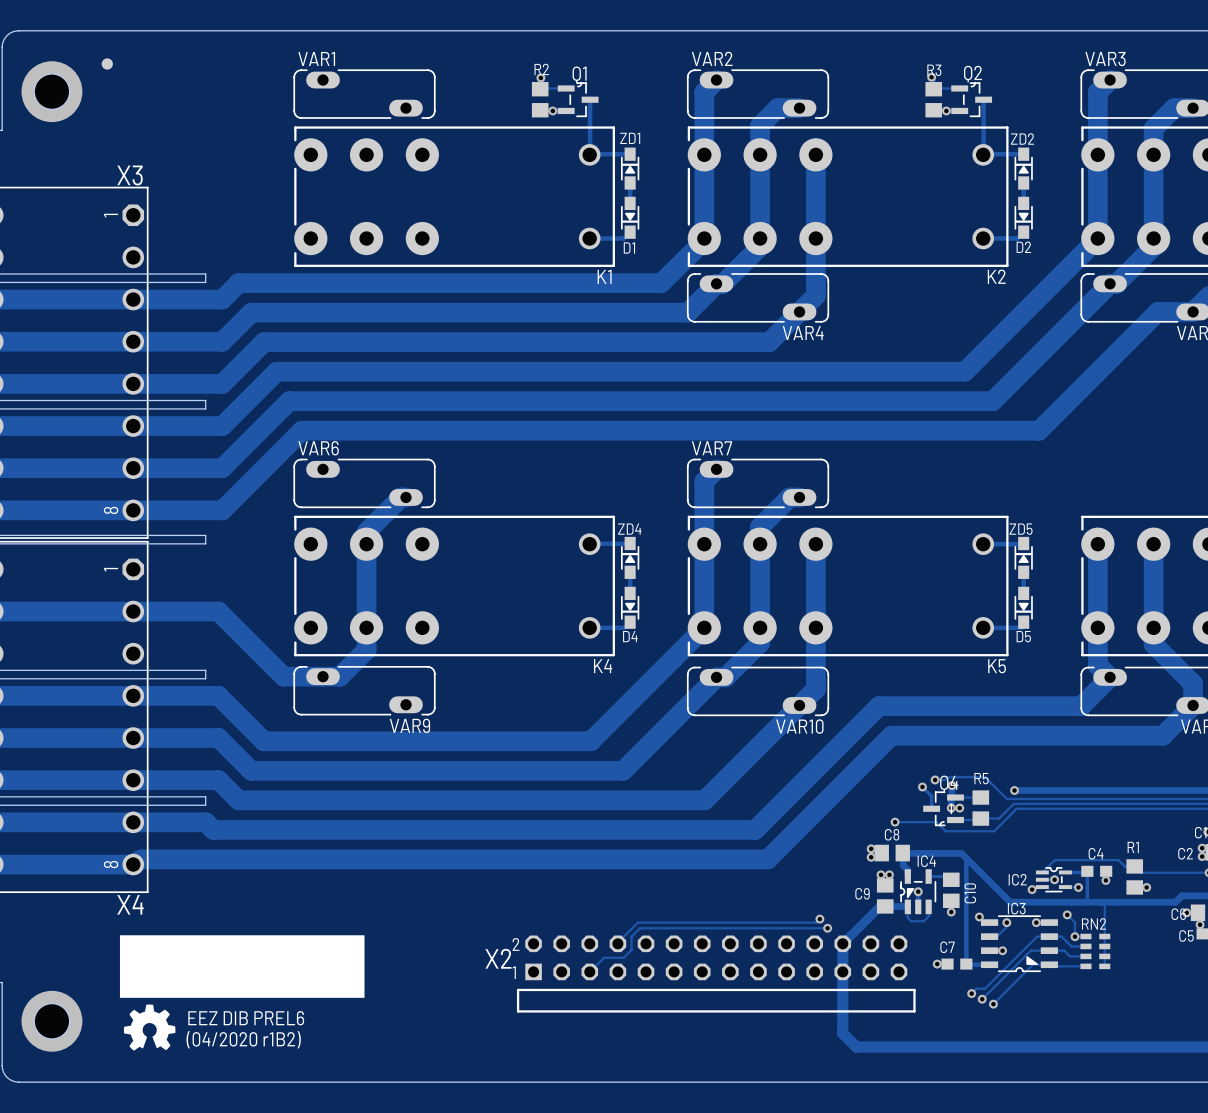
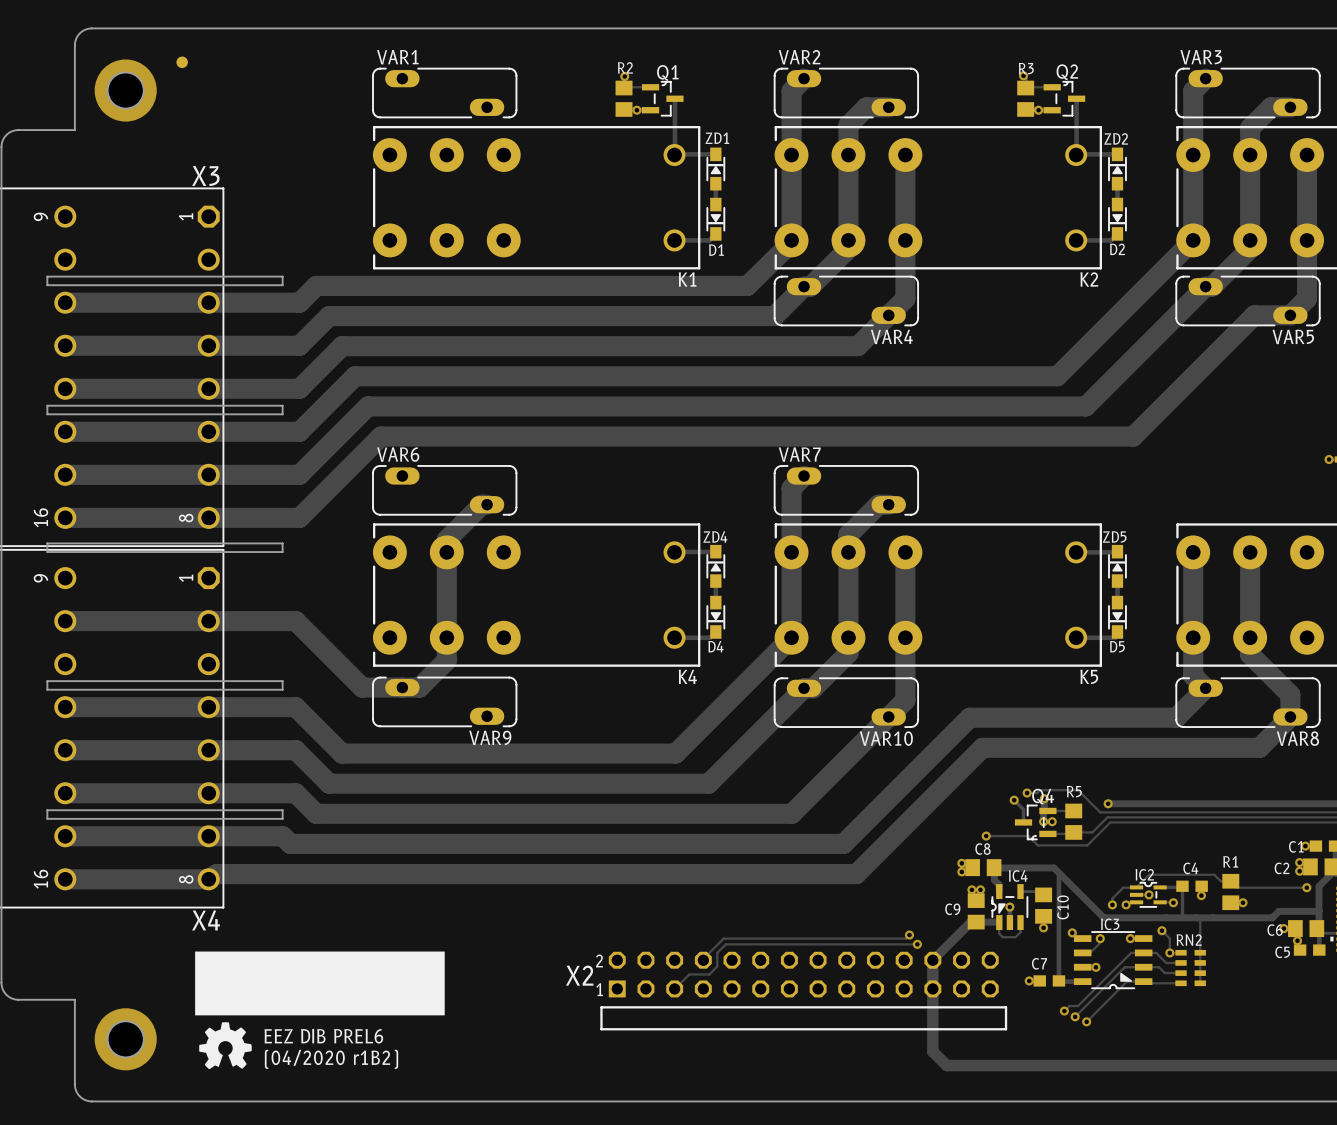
track: none -> (1136, 887) (1123, 887) (1112, 898) (1112, 904)
IC2 name position: IC2 (1017, 879) -> IC2 (1144, 874)
via: none -> (1112, 904)

